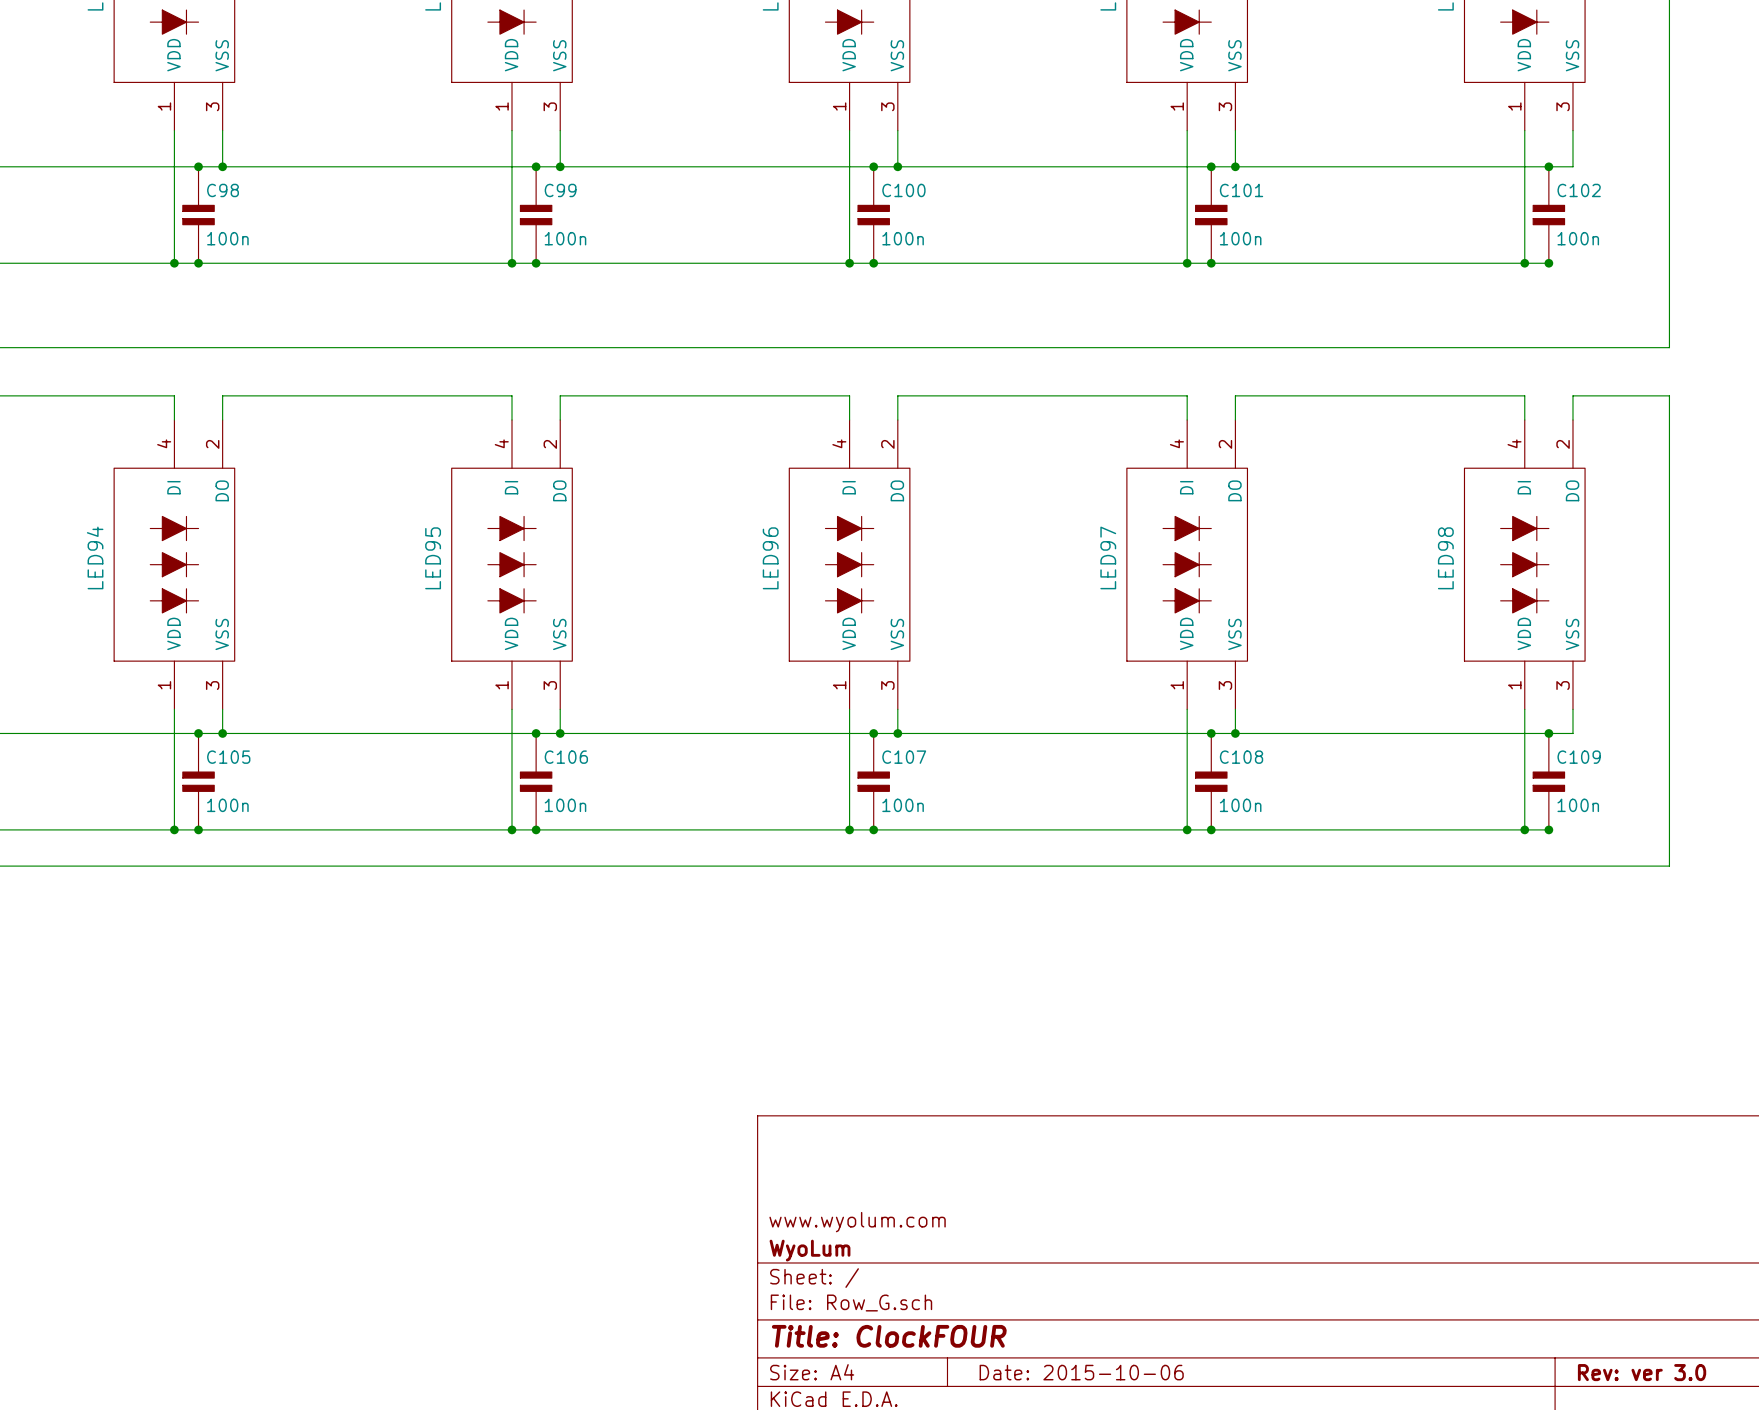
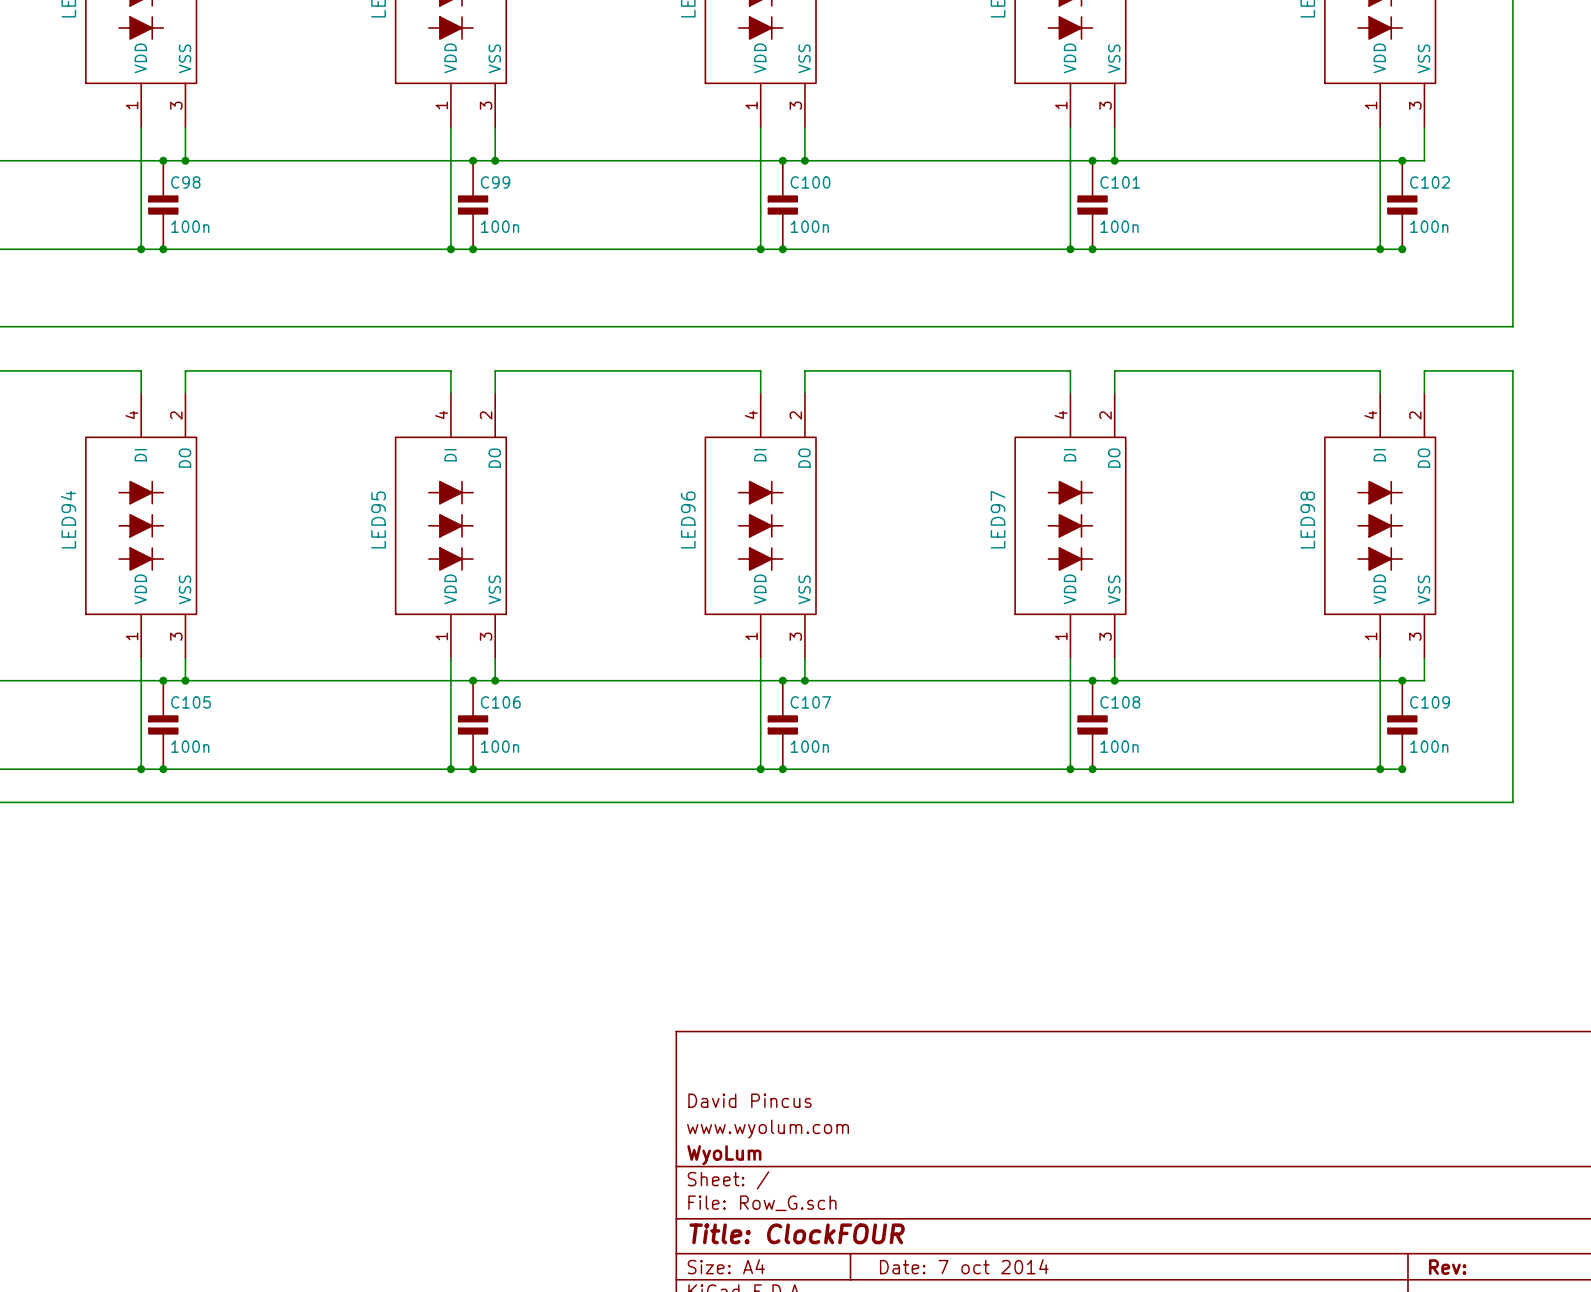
title block: none -> David Pincus (749, 1100)
title block: Date: 2015-10-06 (1081, 1372) -> Date: 7 oct 2014 (964, 1266)
title block: Rev: ver 3.0 (1642, 1372) -> Rev: (1447, 1267)

